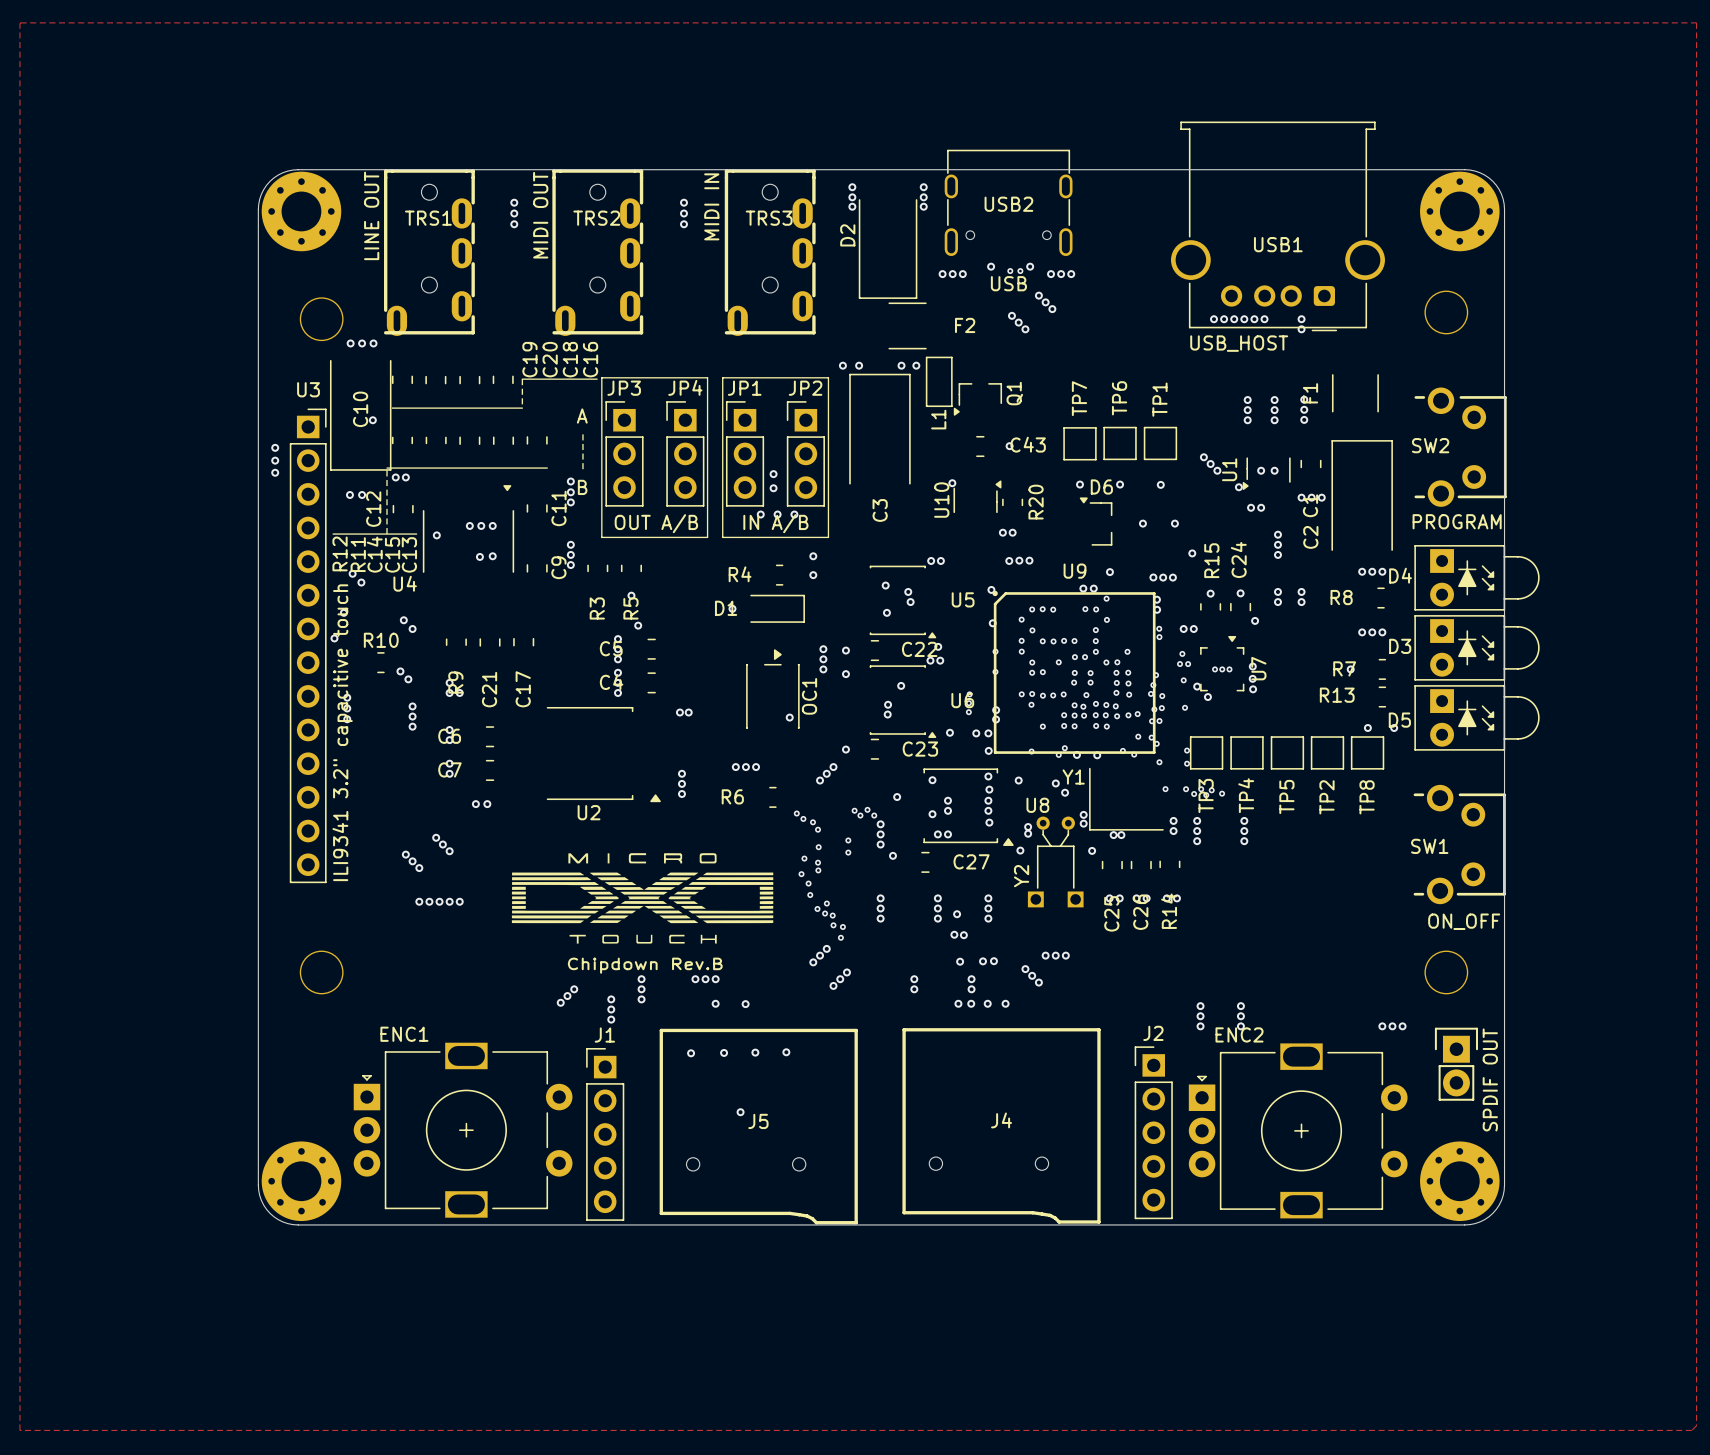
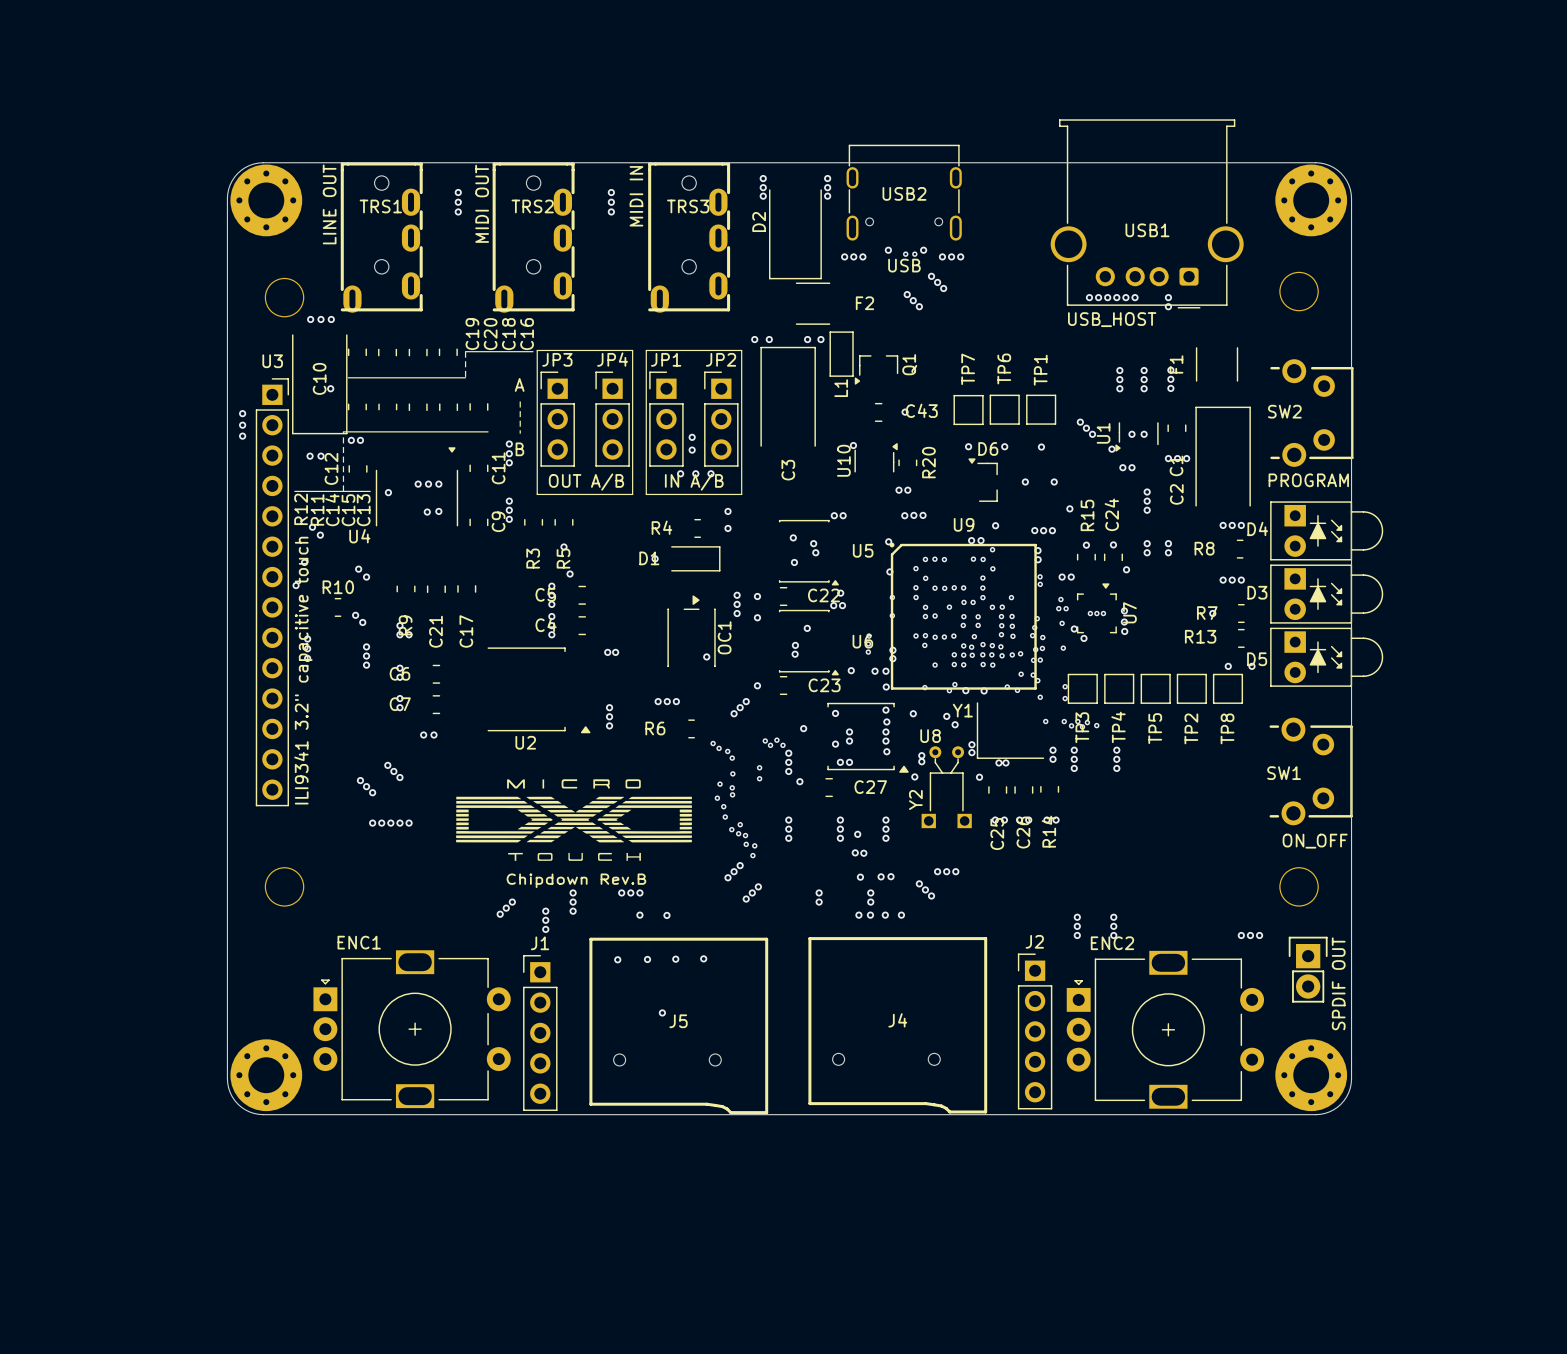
zone outline: (20, 22) (1696, 22) (1696, 1425) (1691, 1430) (19, 1430) (20, 22) -> none

